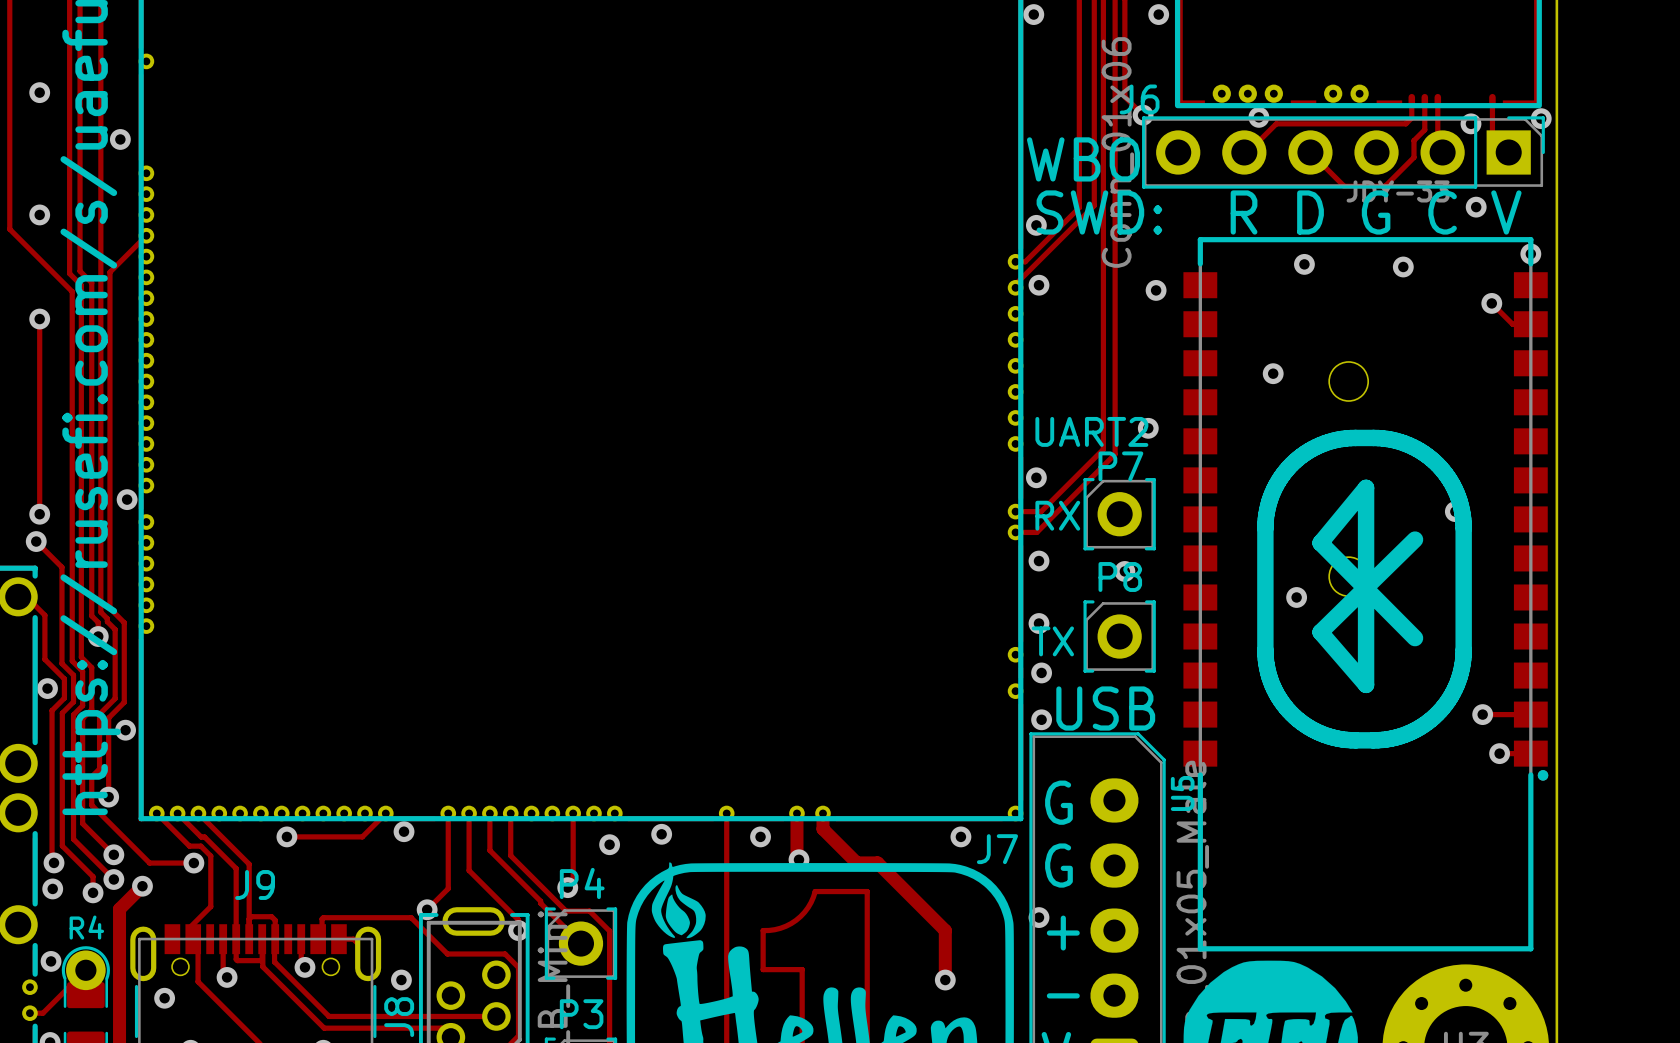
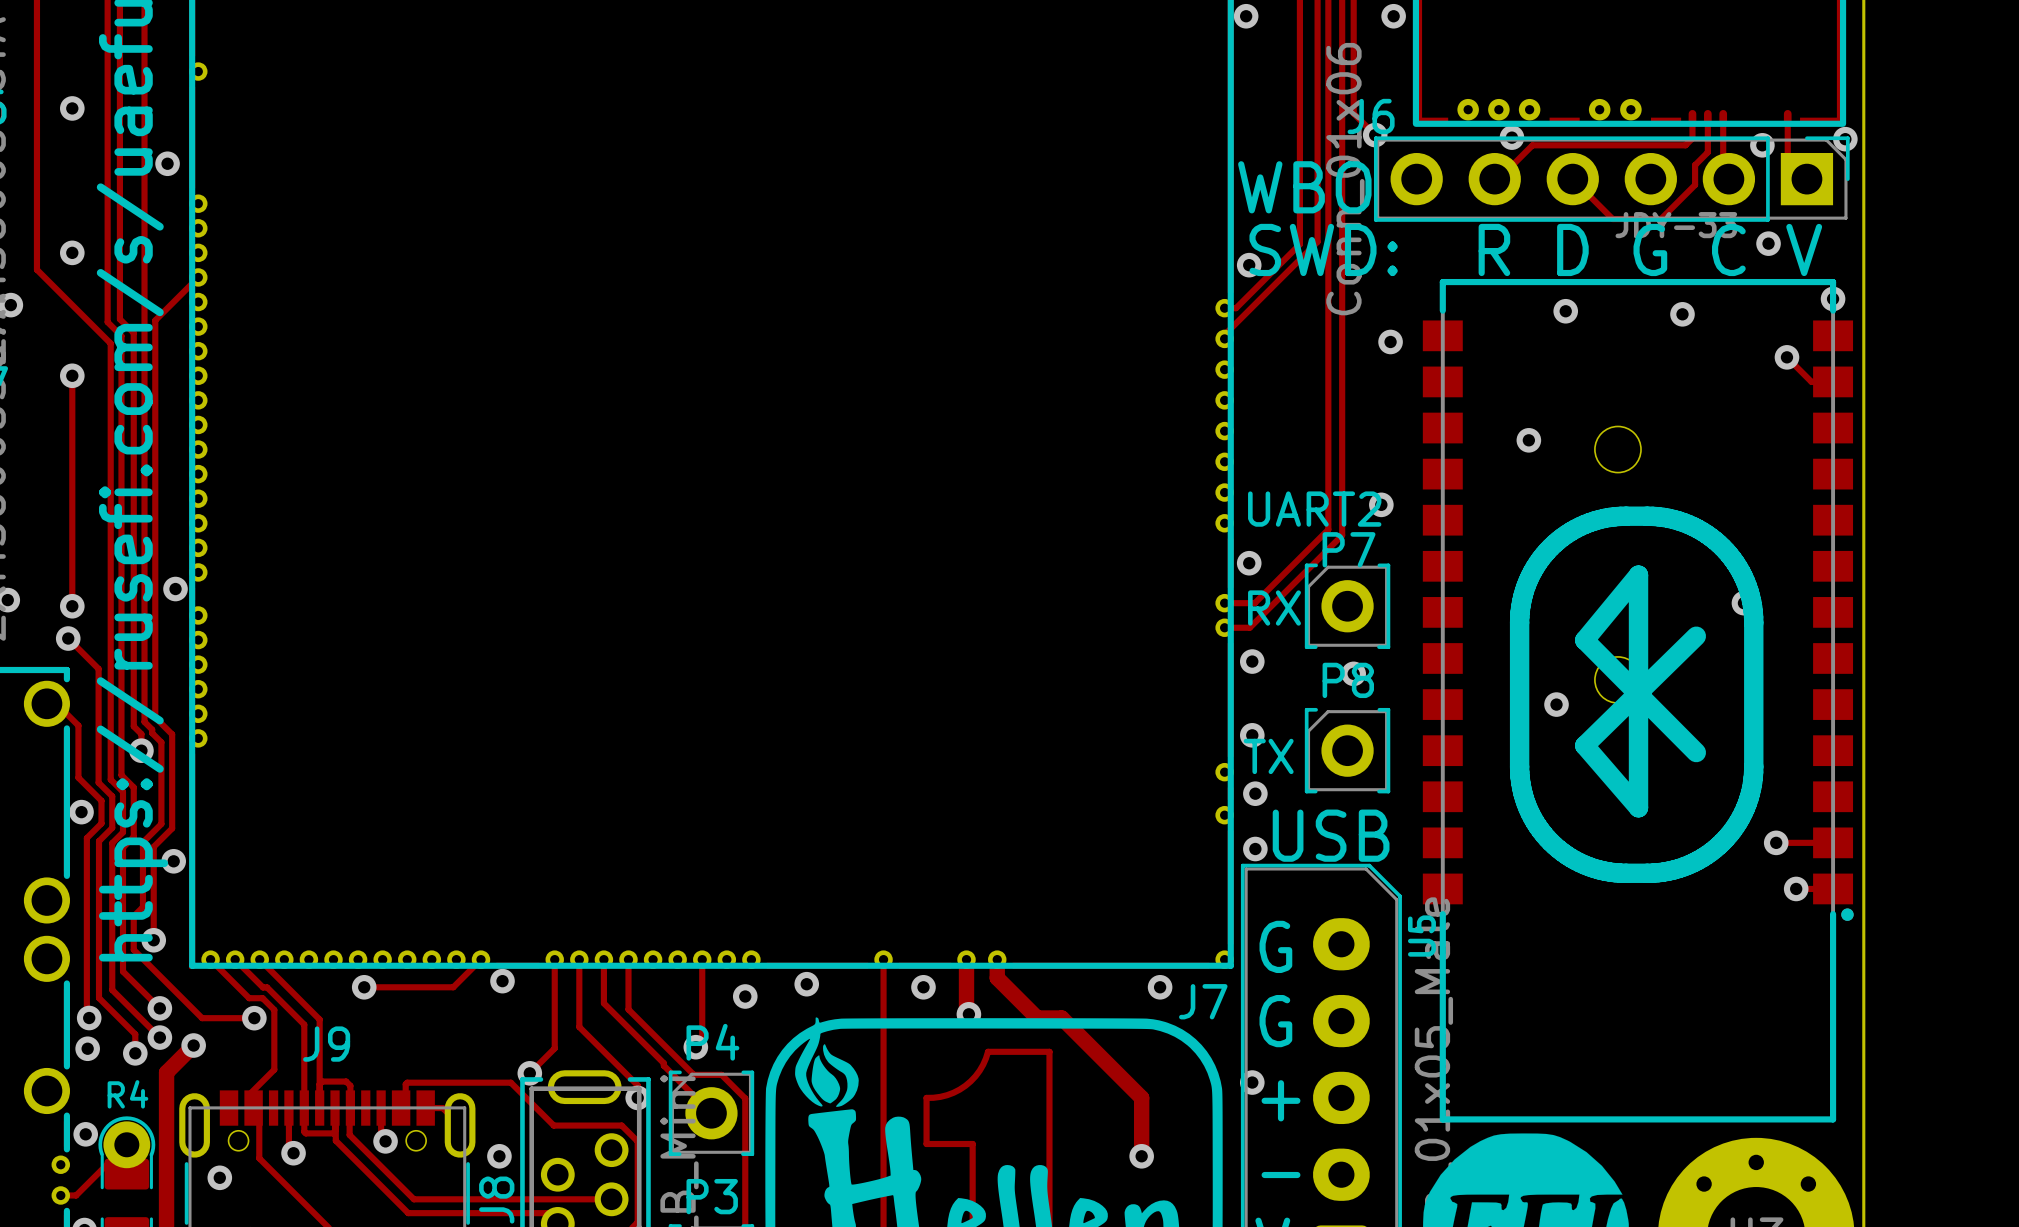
via: (1038, 285) -> none

